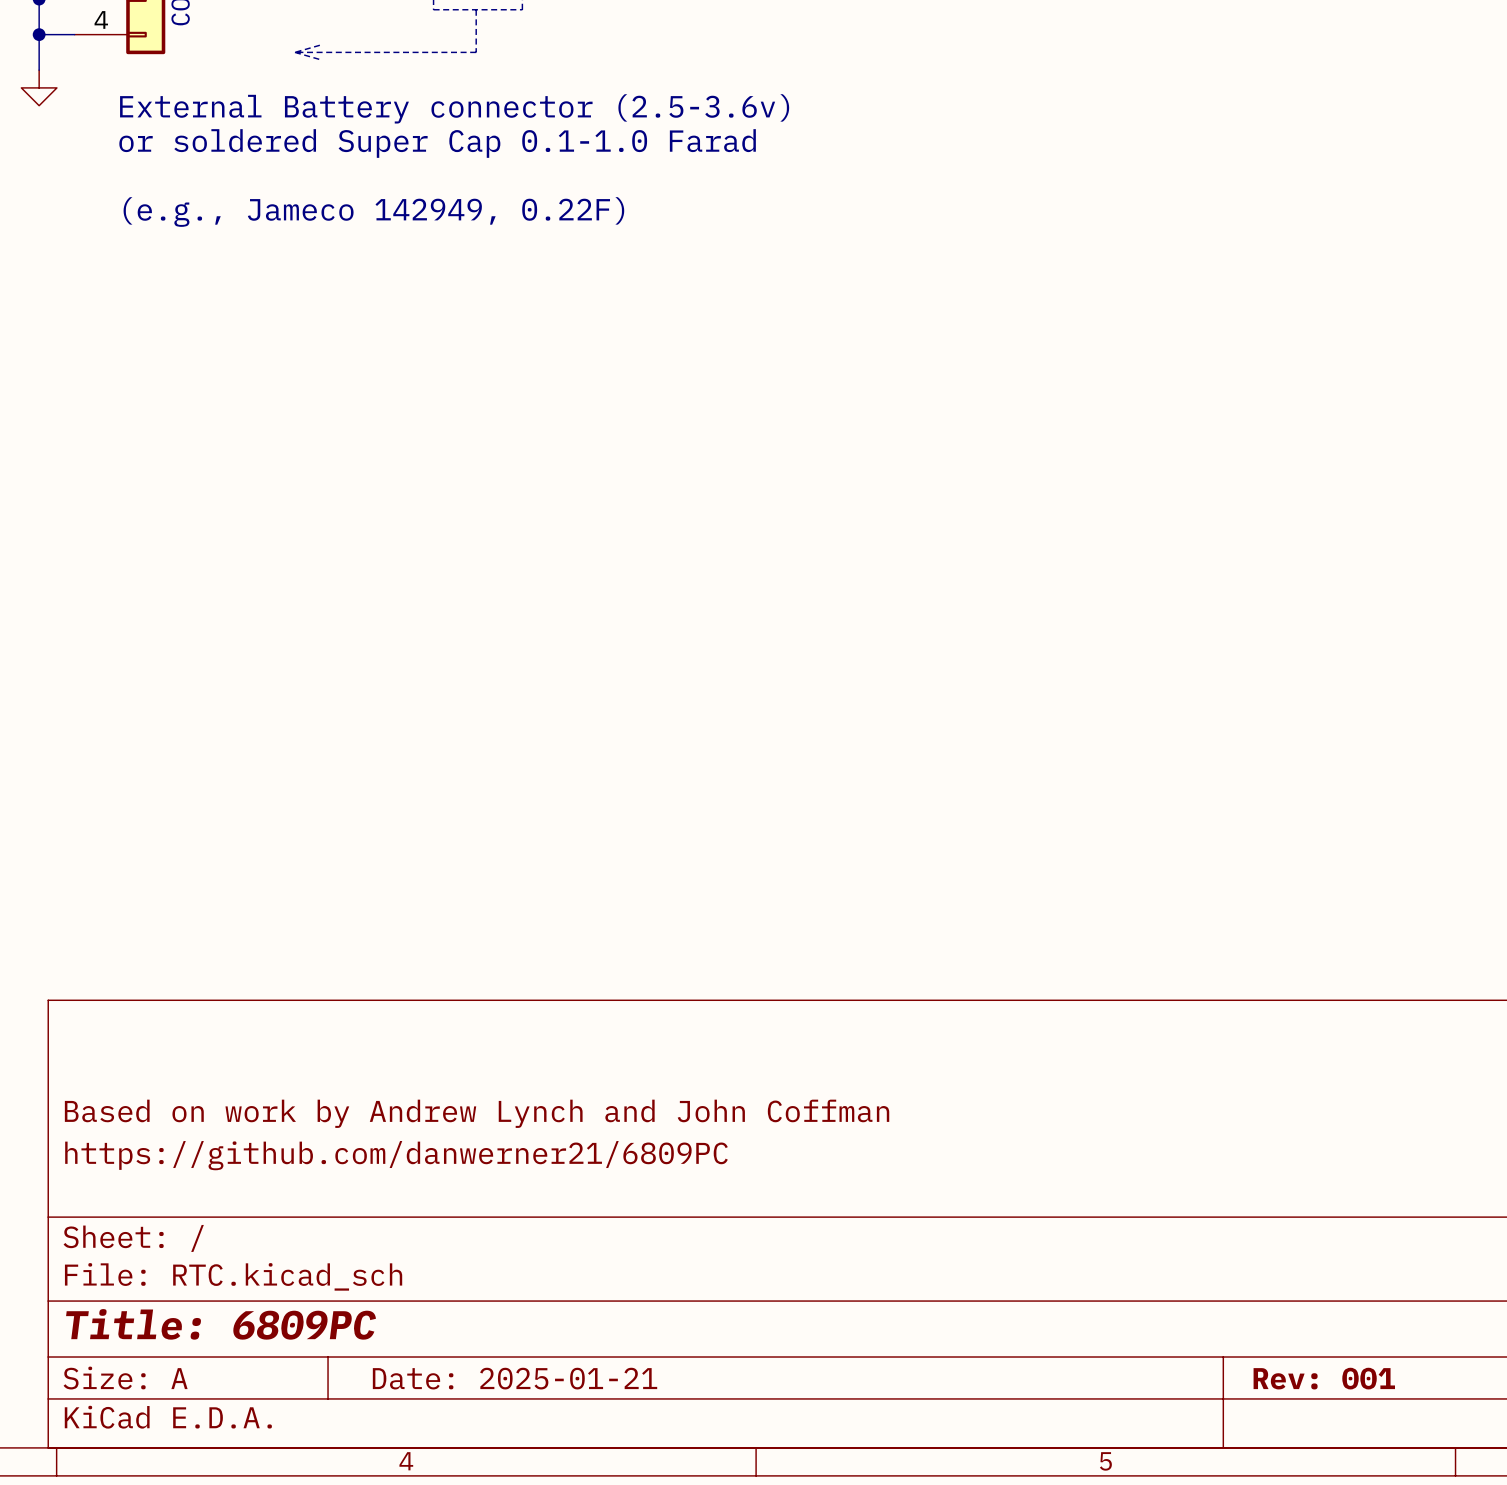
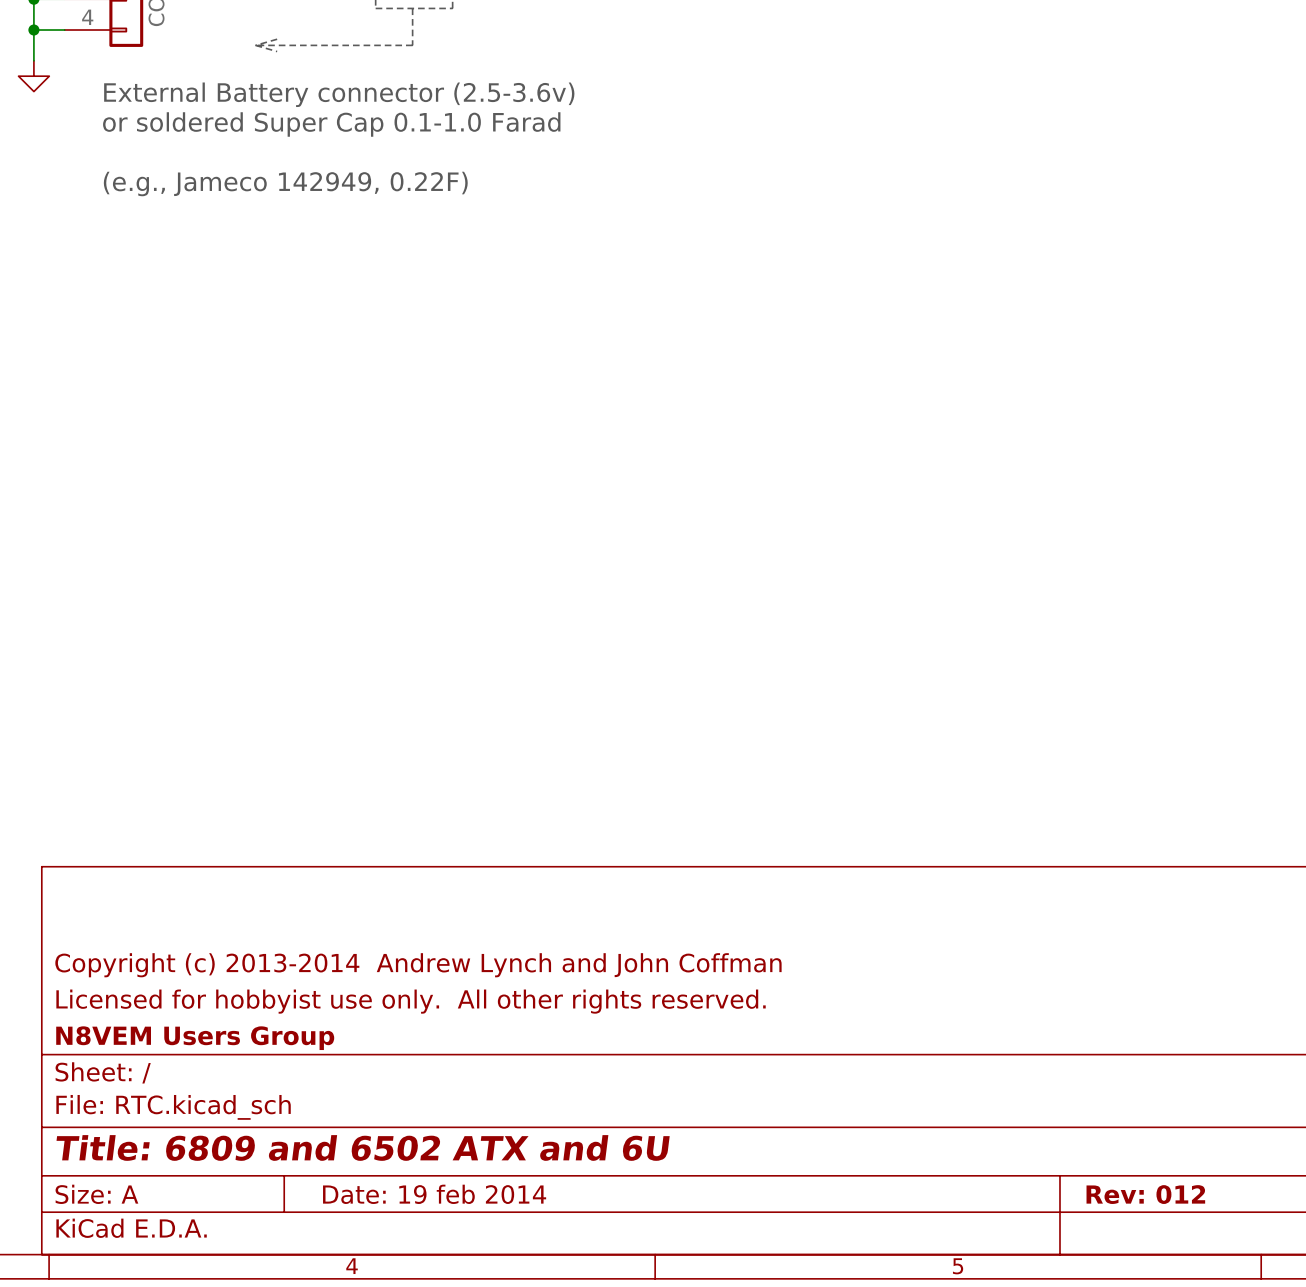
title block: Based on work by Andrew Lynch and John Coffman (477, 1113) -> Copyright (c) 2013-2014 Andrew Lynch and John Coffman (418, 965)
title block: https://github.com/danwerner21/6809PC (396, 1155) -> Licensed for hobbyist use only. All other rights reserved. (411, 1001)
title block: none -> N8VEM Users Group (195, 1038)
title block: Title: 6809PC (221, 1324) -> Title: 6809 and 6502 ATX and 6U (363, 1147)
title block: Date: 2025-01-21 (515, 1378) -> Date: 19 feb 2014 (434, 1194)
title block: Rev: 001 (1324, 1378) -> Rev: 012 (1145, 1194)

